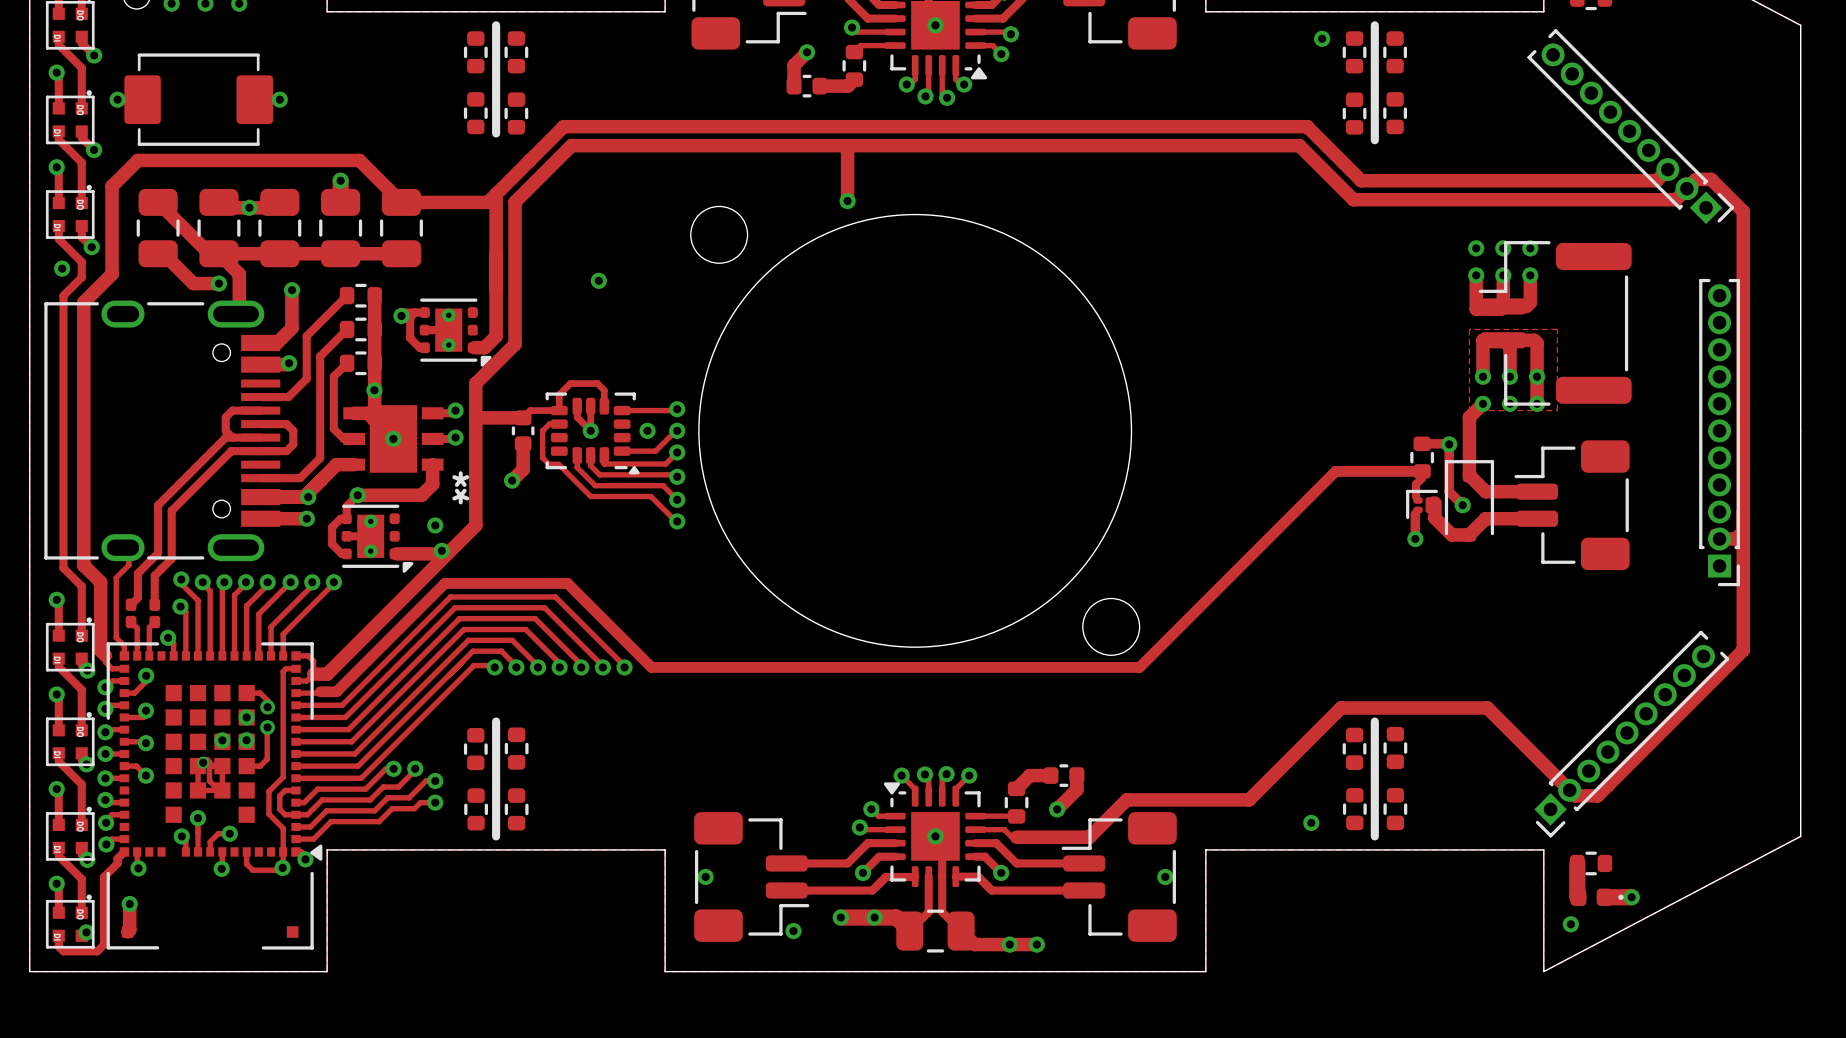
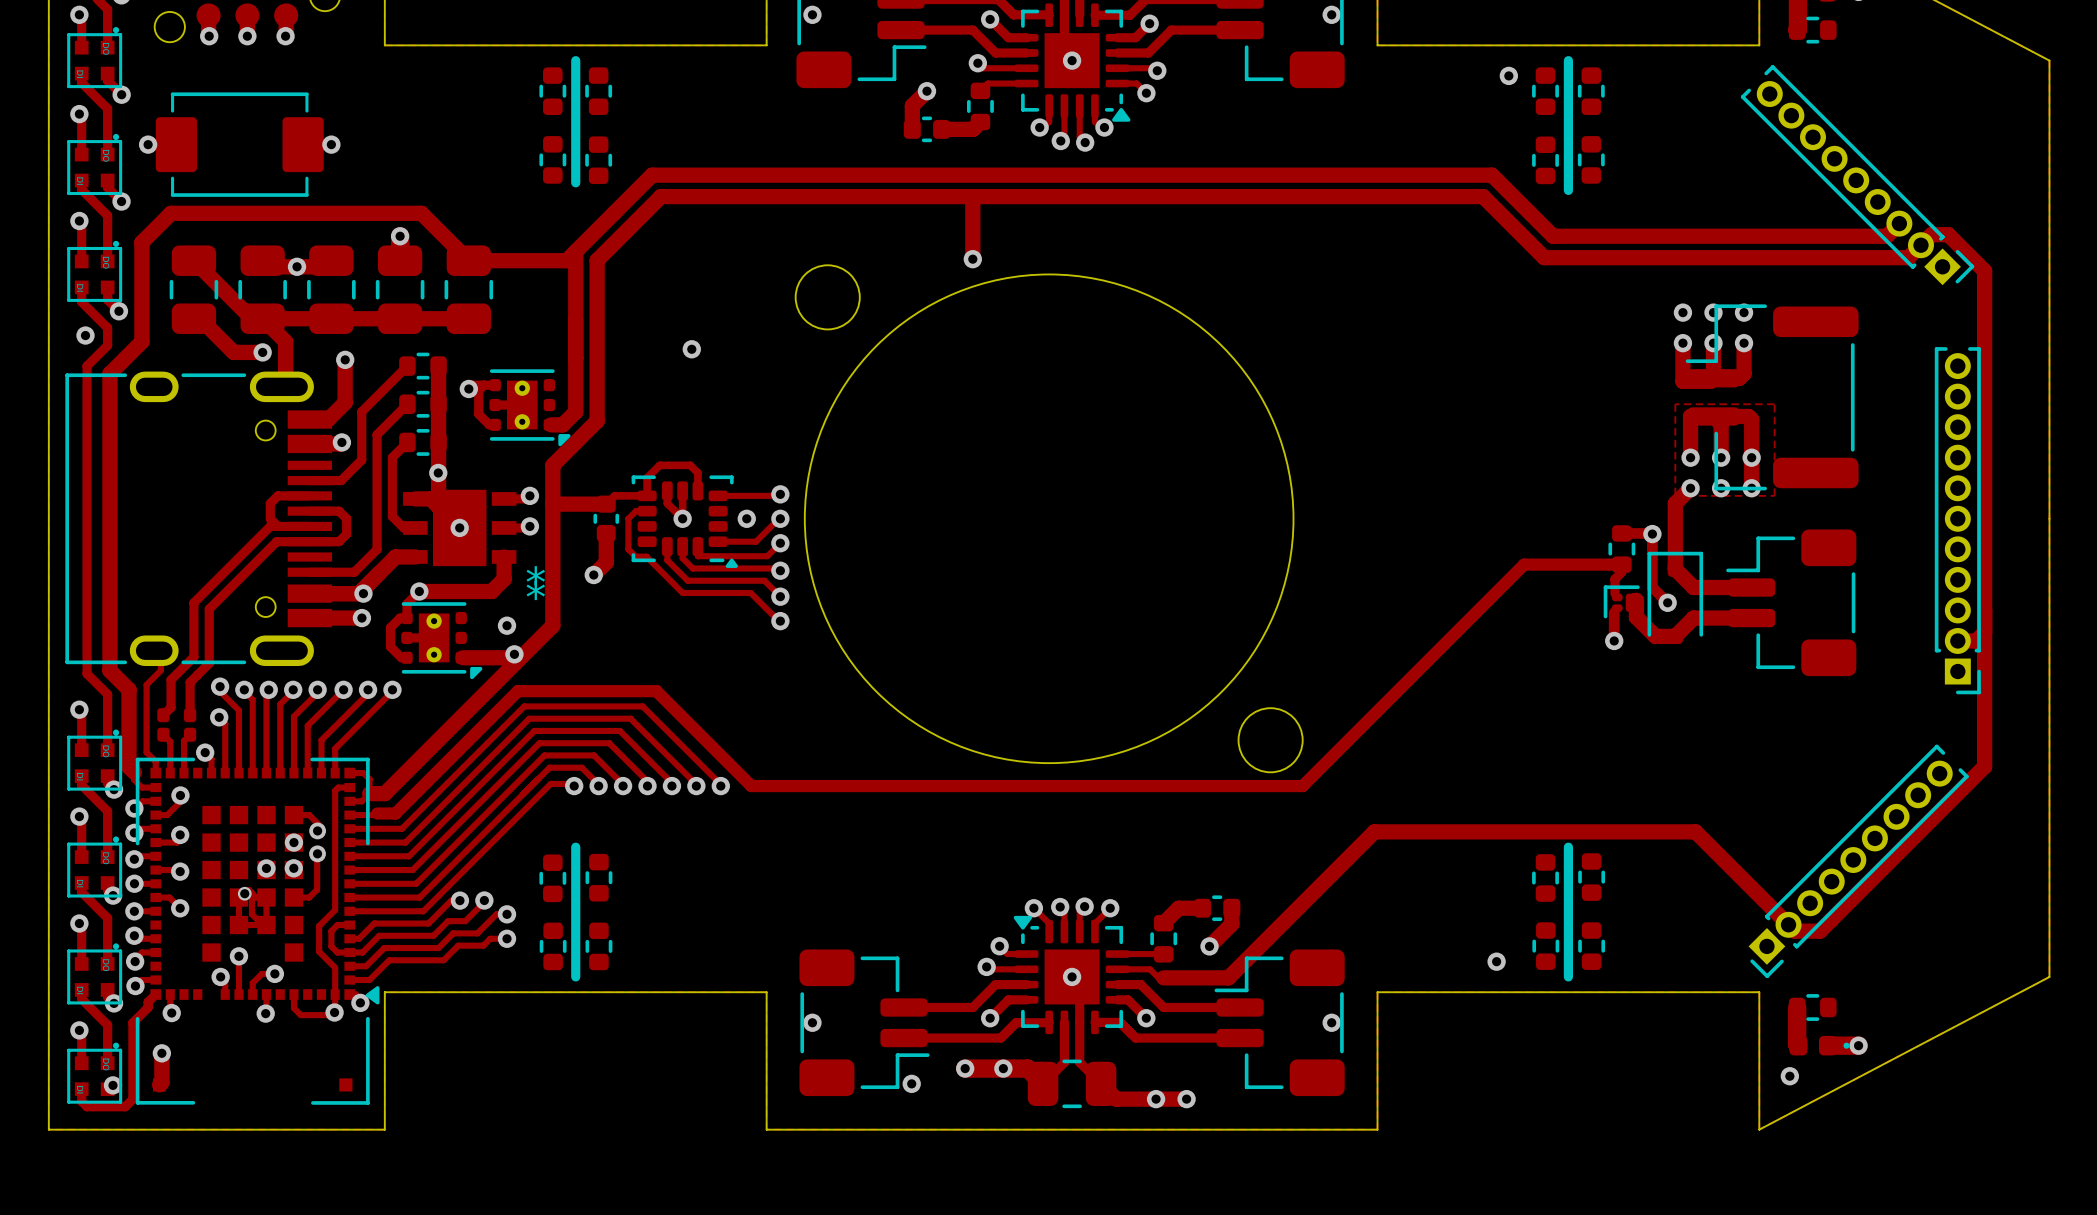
track: (1341, 707) (1249, 799) (1126, 799) (1089, 837) (1073, 837) -> (1530, 831) (1374, 831) (1228, 977)

